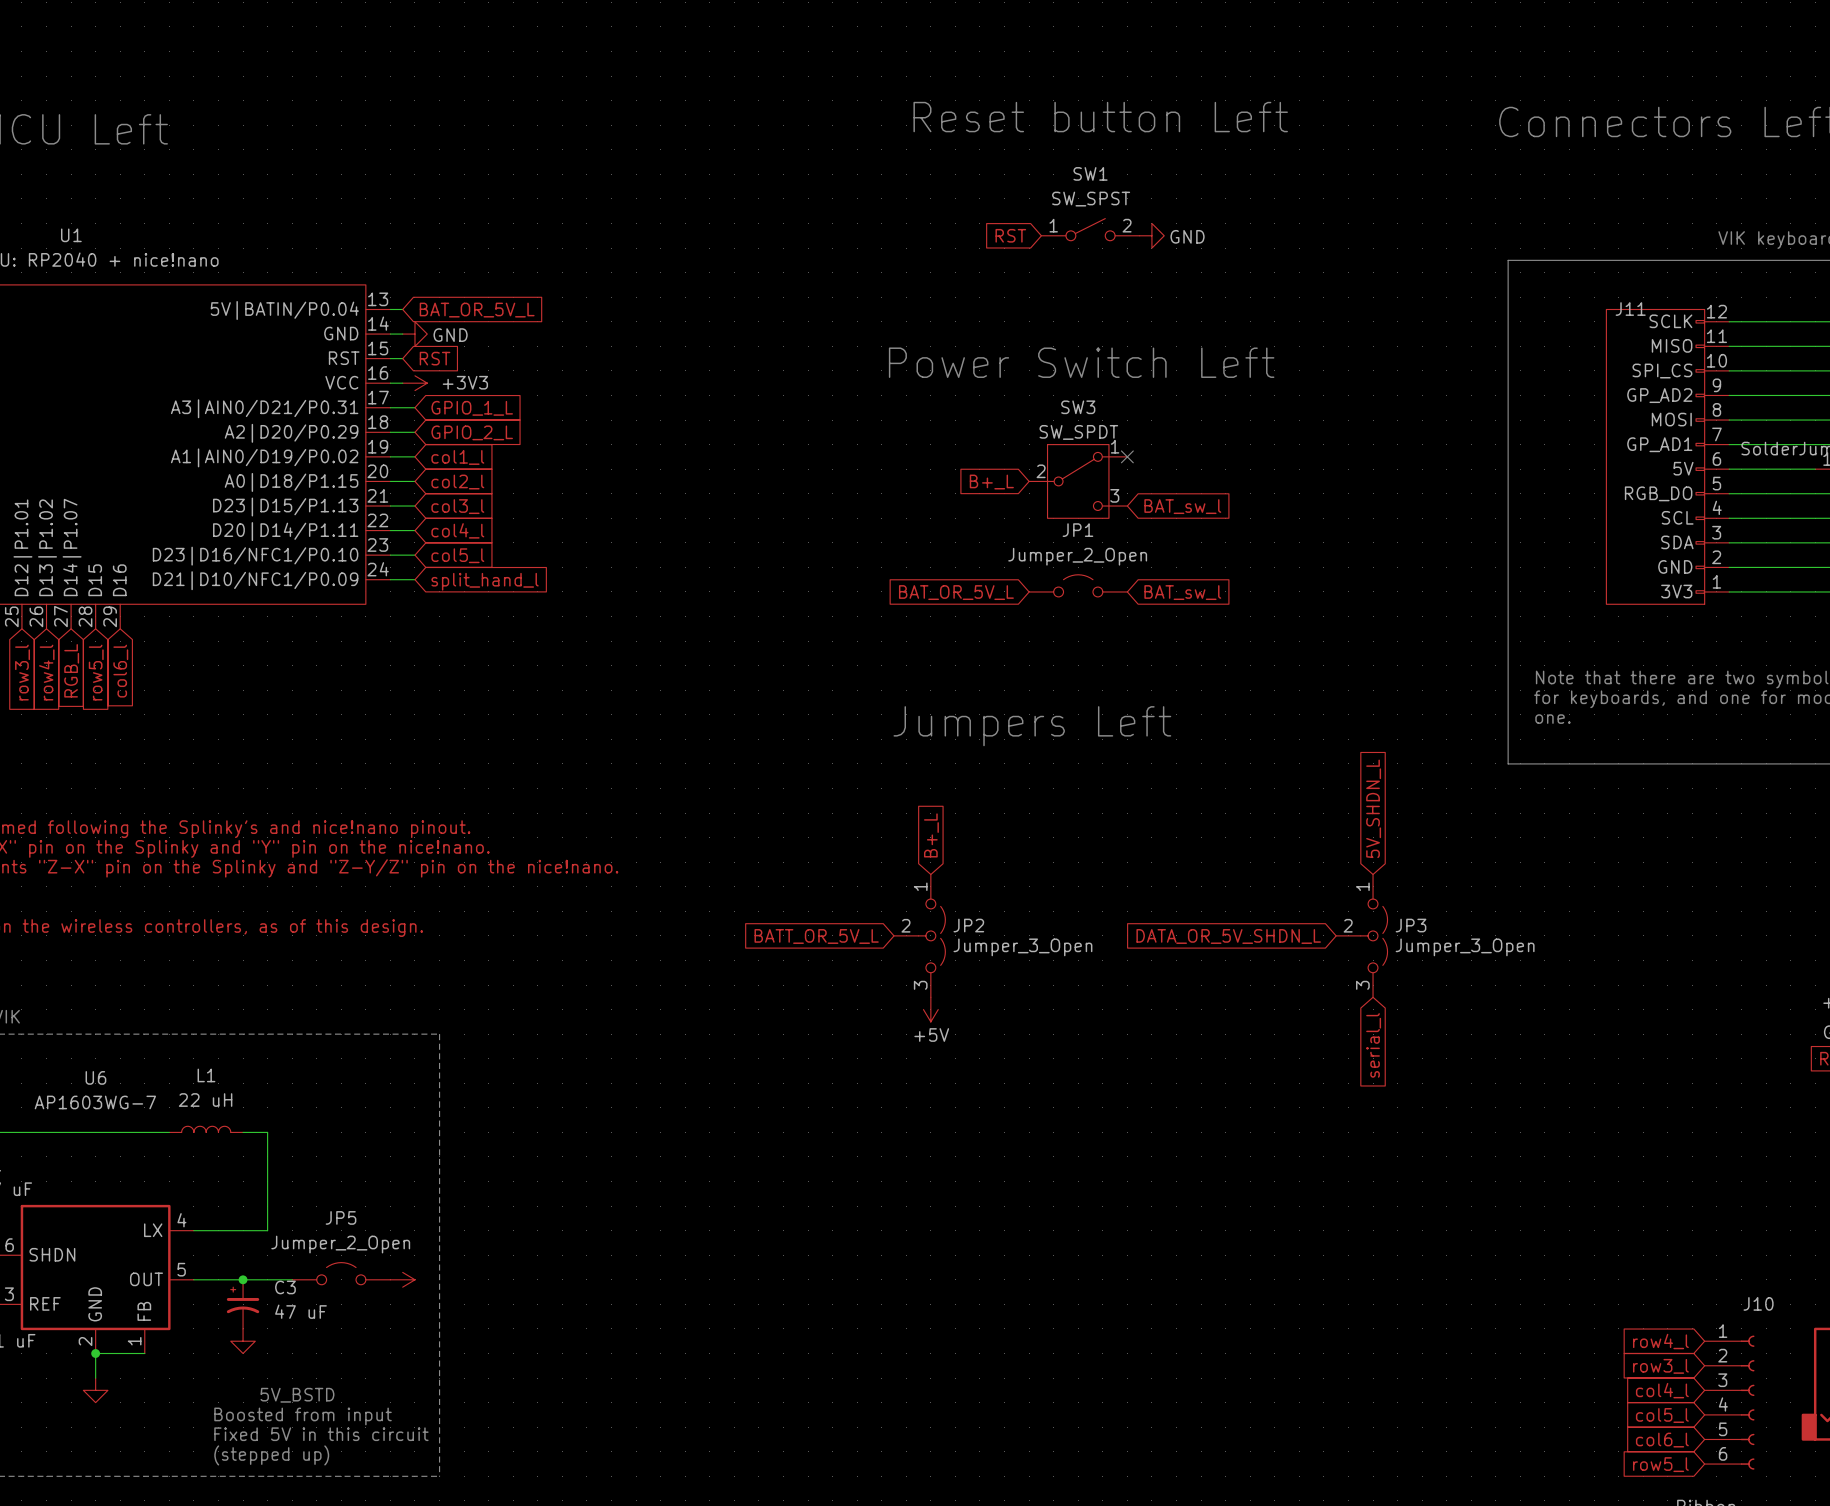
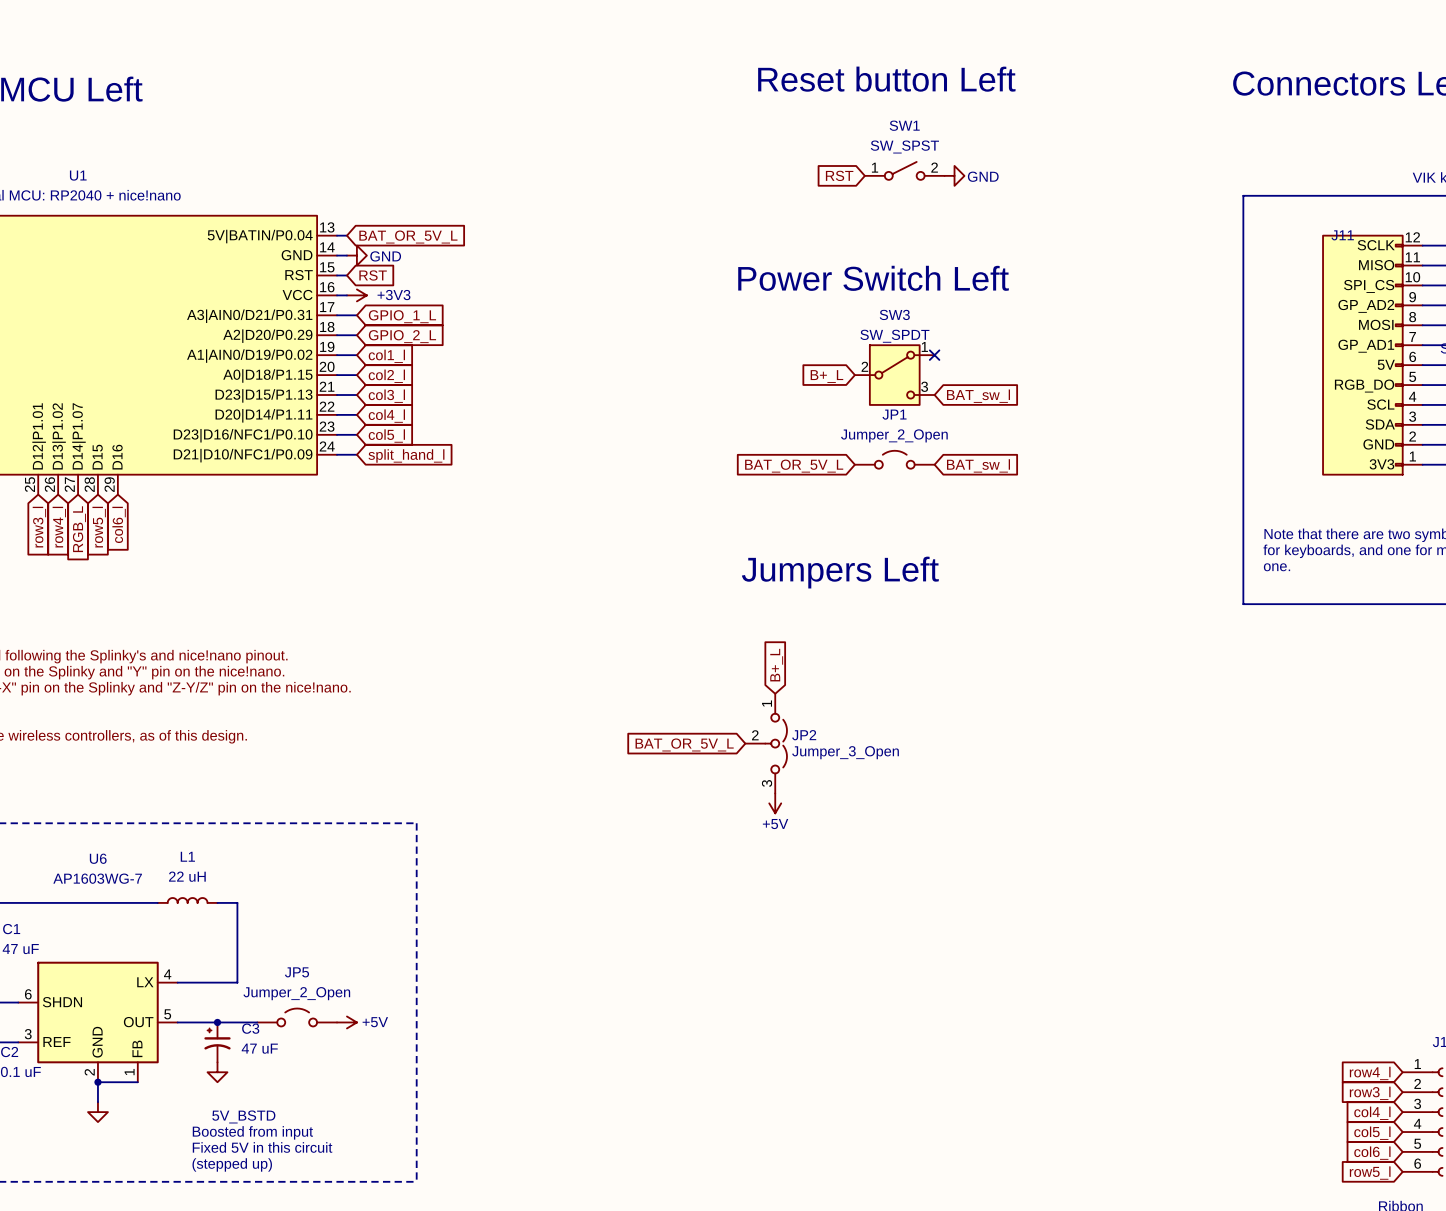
global label: 5V_SHDN_L (1373, 808) -> none
JP3: Jumper_3_Open (1361, 935) -> none
global label: BATT_OR_5V_L (816, 936) -> BAT_OR_5V_L (684, 744)
global label: DATA_OR_5V_SHDN_L (1228, 936) -> none
line: (439, 1034) (439, 1476) -> (376, 823) (416, 823) (416, 1181) (376, 1181)
global label: serial_l (1373, 1045) -> none
power symbol text: none -> +5V (375, 1022)

